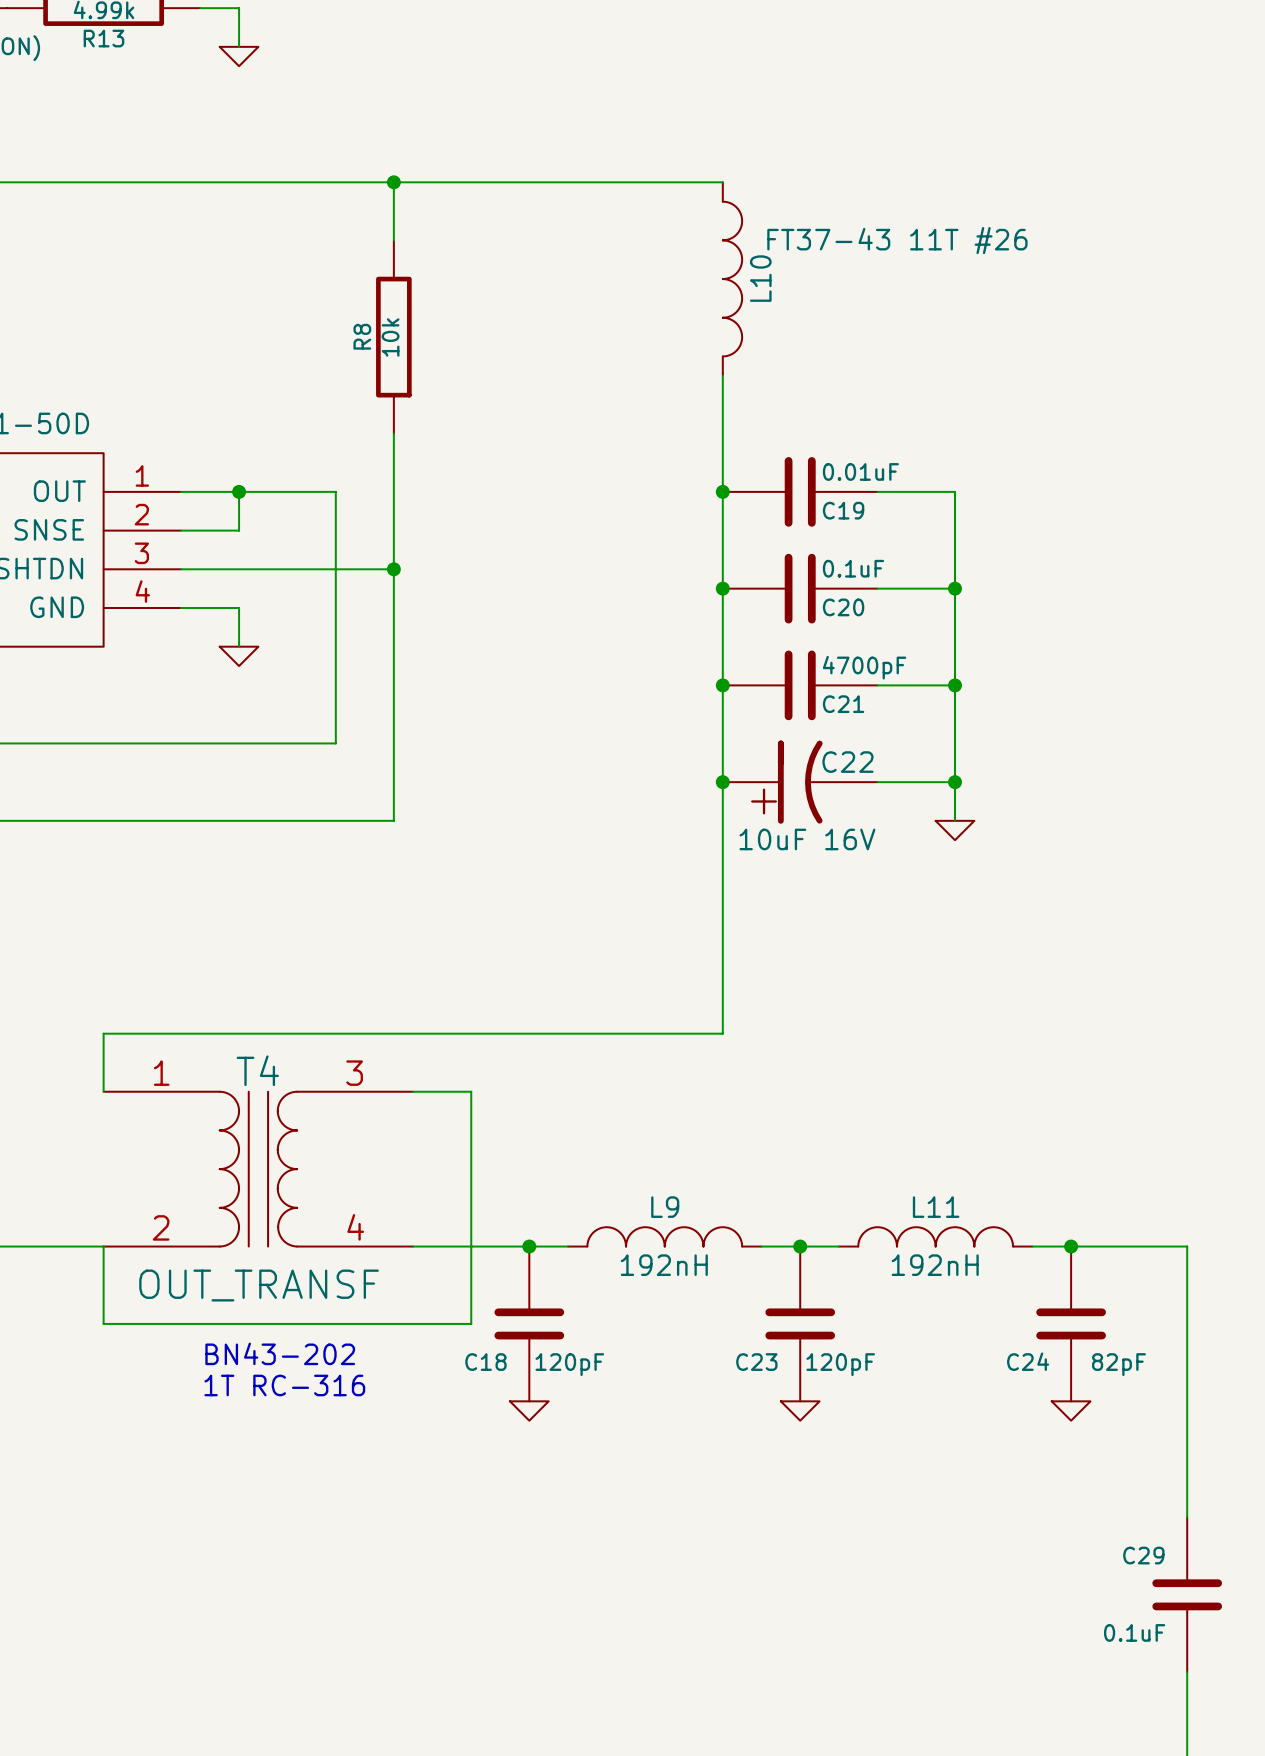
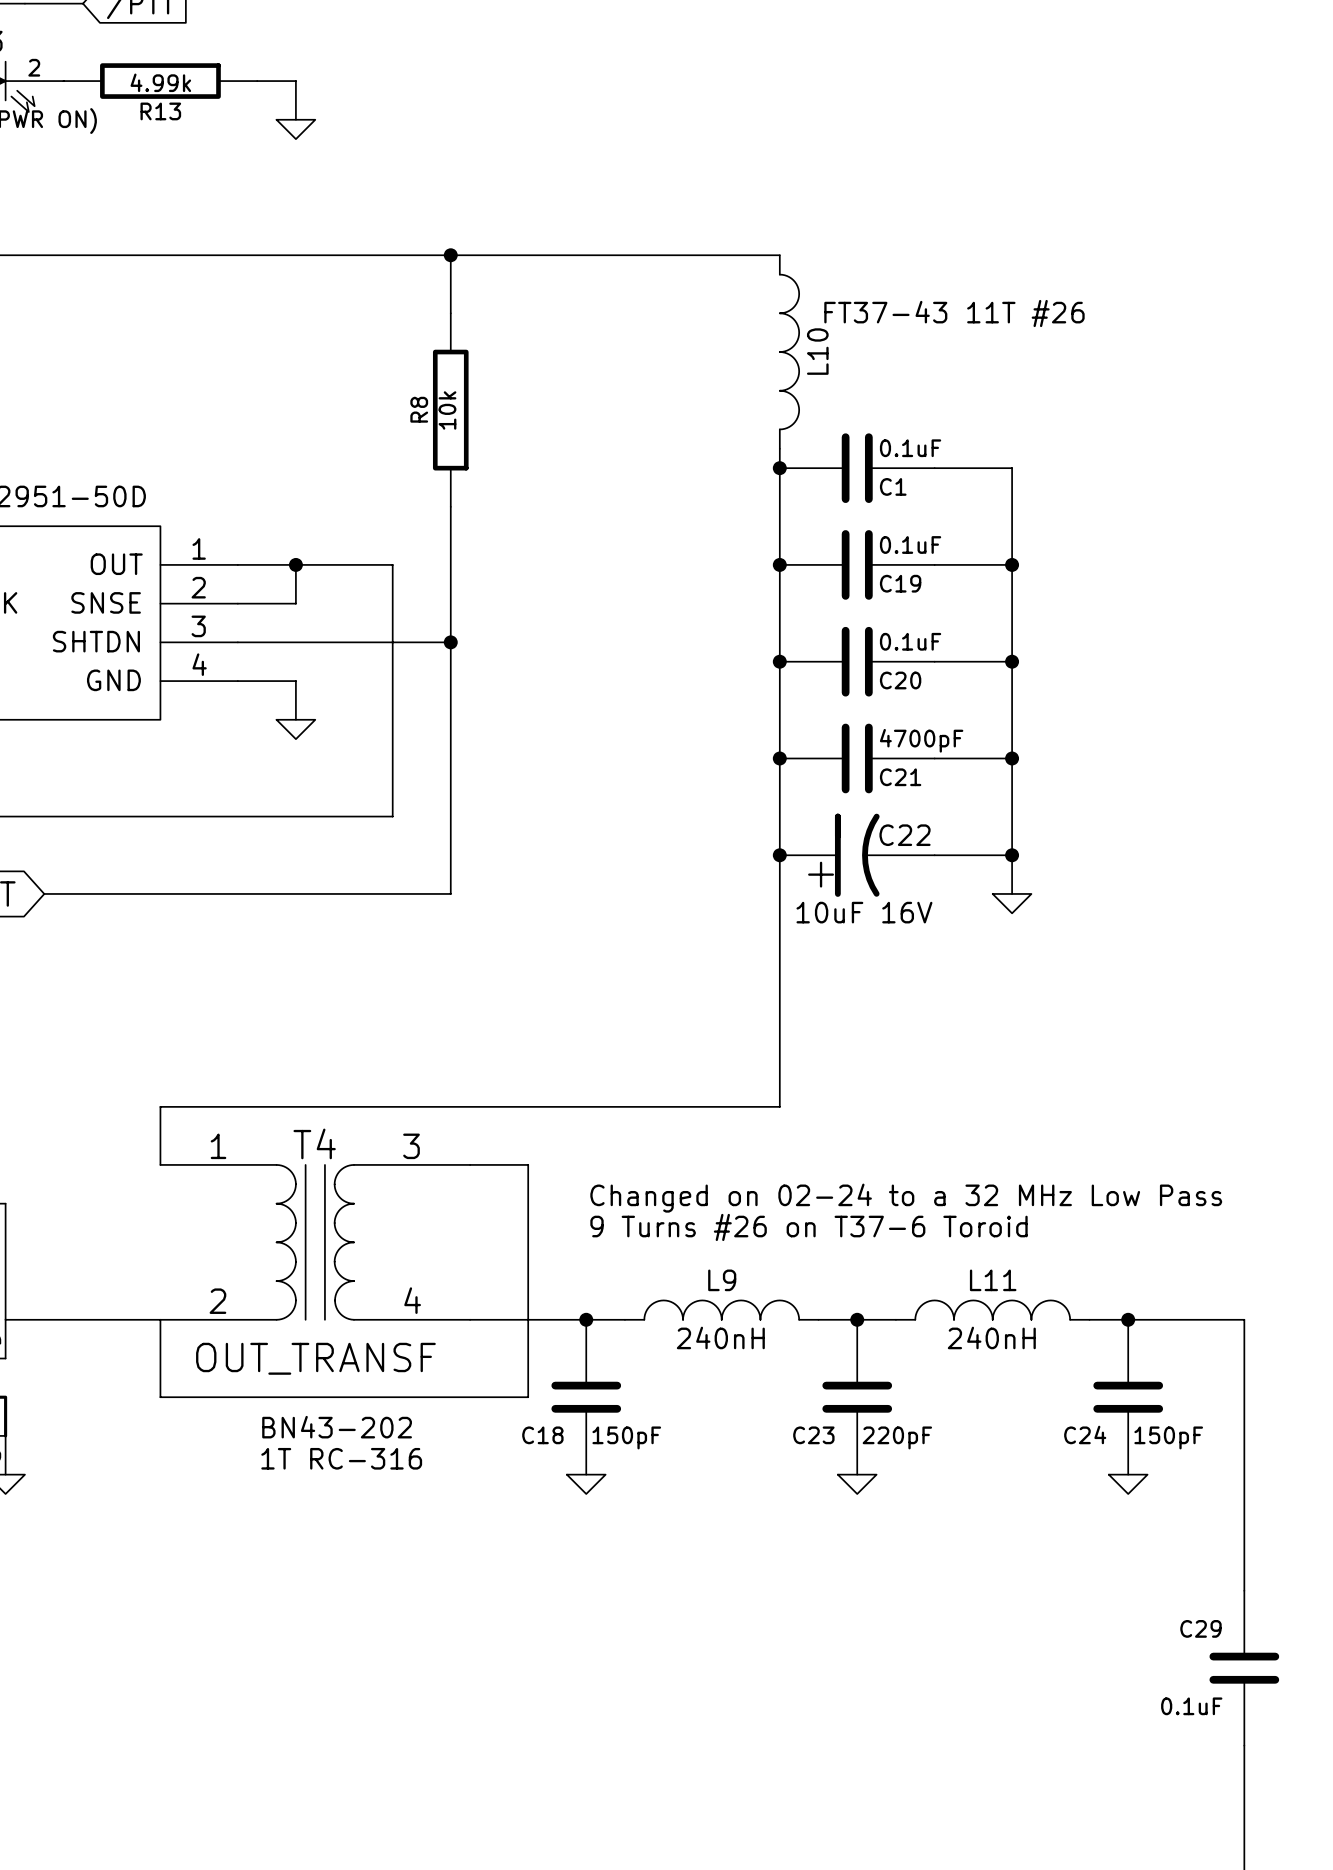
junction: none -> (779, 468)
C1: none -> 0.1uF (857, 468)
wire: none -> (934, 468) (1012, 468) (1012, 564)
C19 value: 0.01uF (860, 471) -> 0.1uF (910, 545)
junction: none -> (1012, 564)
text: none -> Changed on 02-24 to a 32 MHz Low Pass (906, 1198)
text: none -> 9 Turns #26 on T37-6 Toroid (808, 1227)
L9 value: 192nH (664, 1265) -> 240nH (720, 1337)
L11 value: 192nH (935, 1265) -> 240nH (991, 1337)
C18 value: 120pF (569, 1364) -> 150pF (626, 1437)
C23 value: 120pF (840, 1364) -> 220pF (897, 1437)
C24 value: 82pF (1118, 1364) -> 150pF (1168, 1437)

